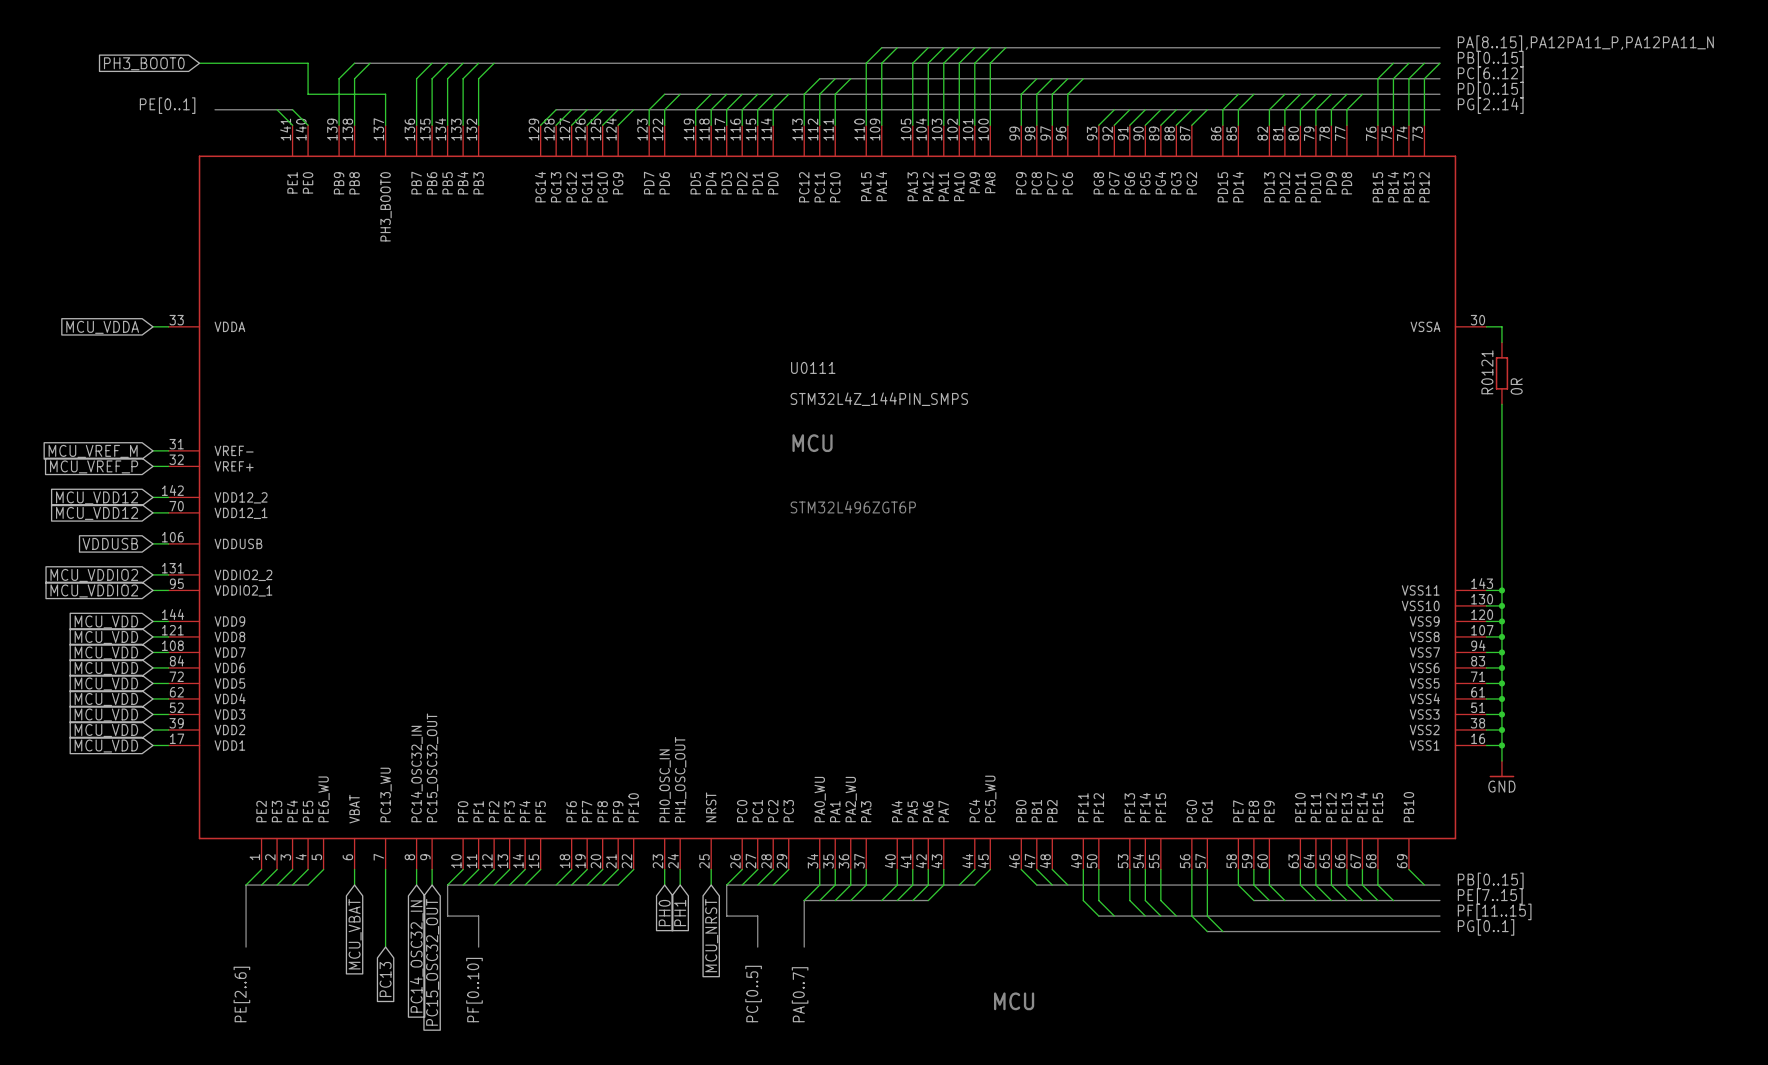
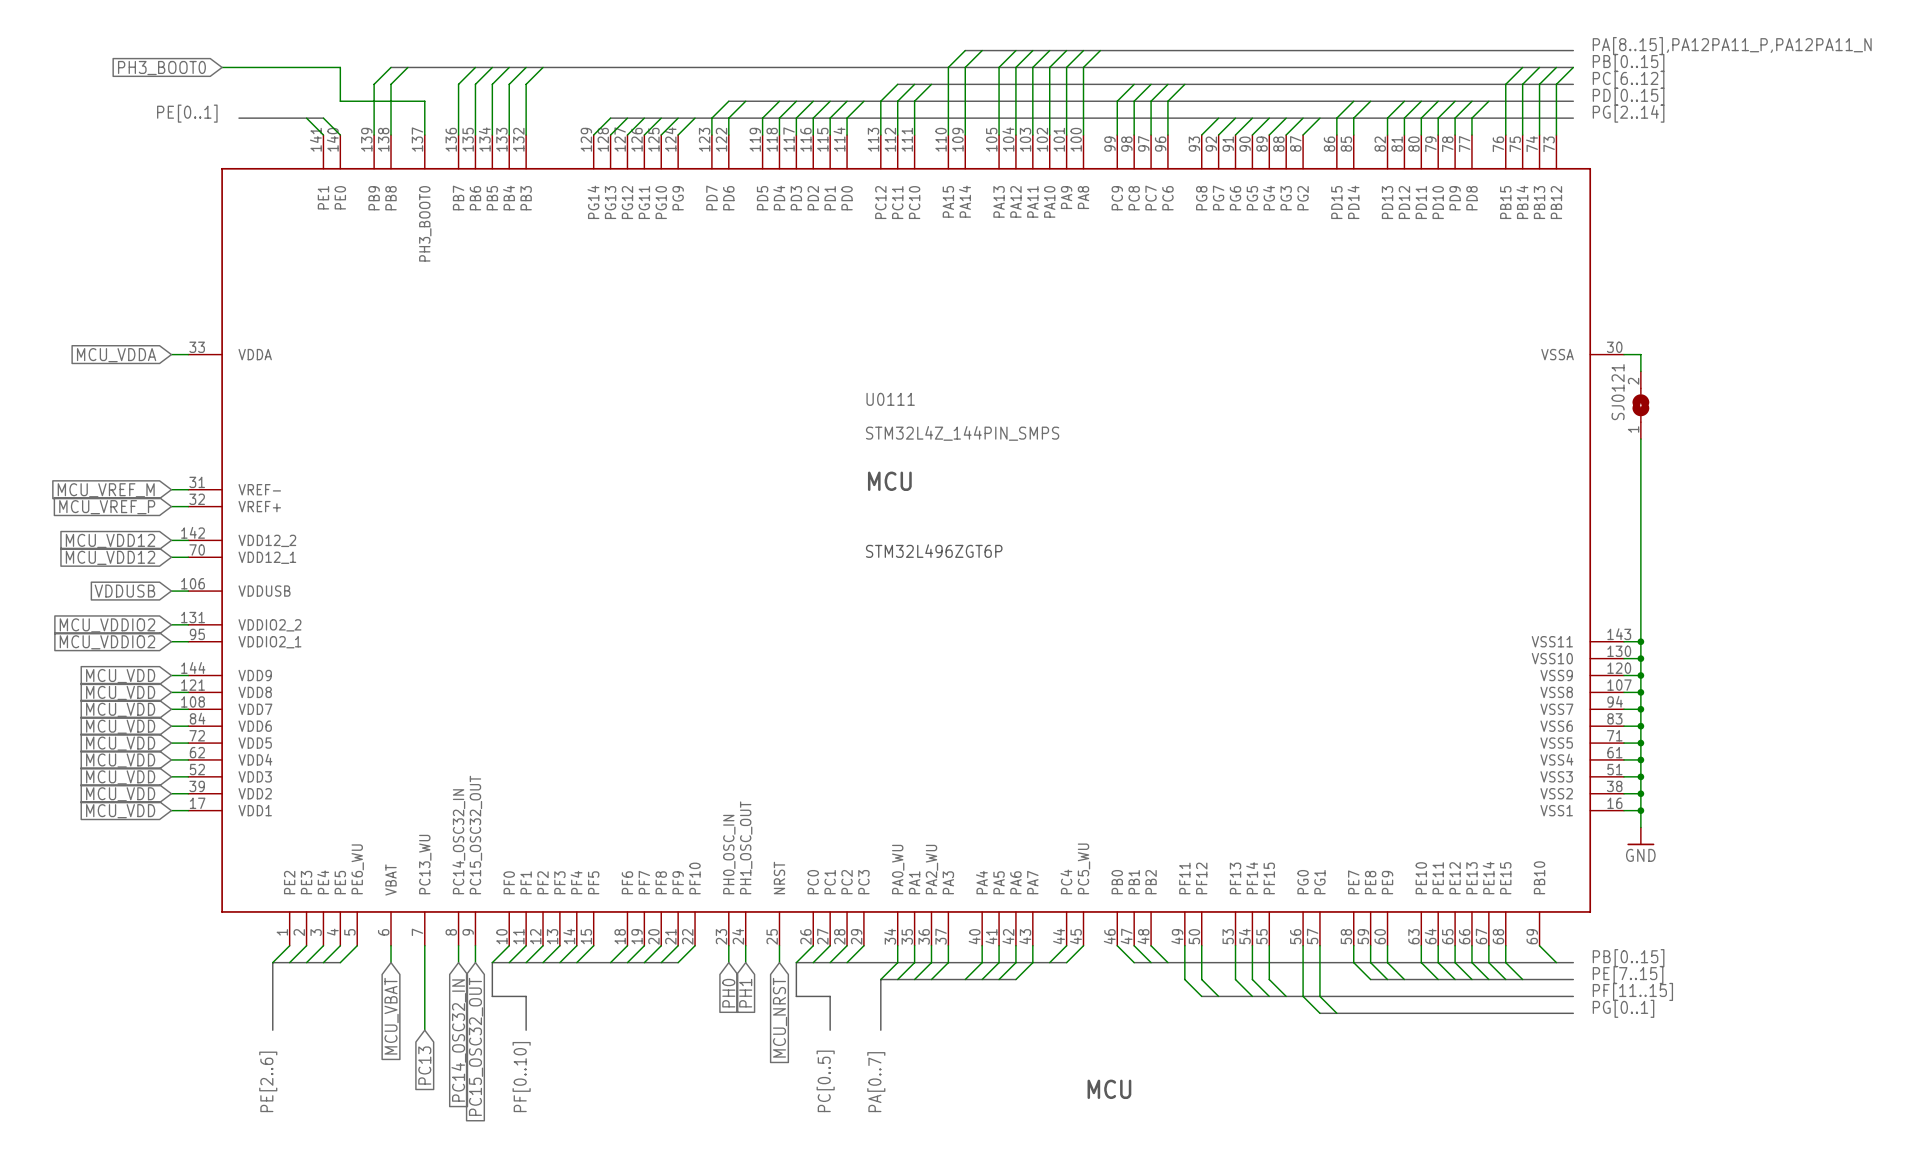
R0121: 0R (1501, 373) -> none
SJ0121: none -> (1640, 405)

